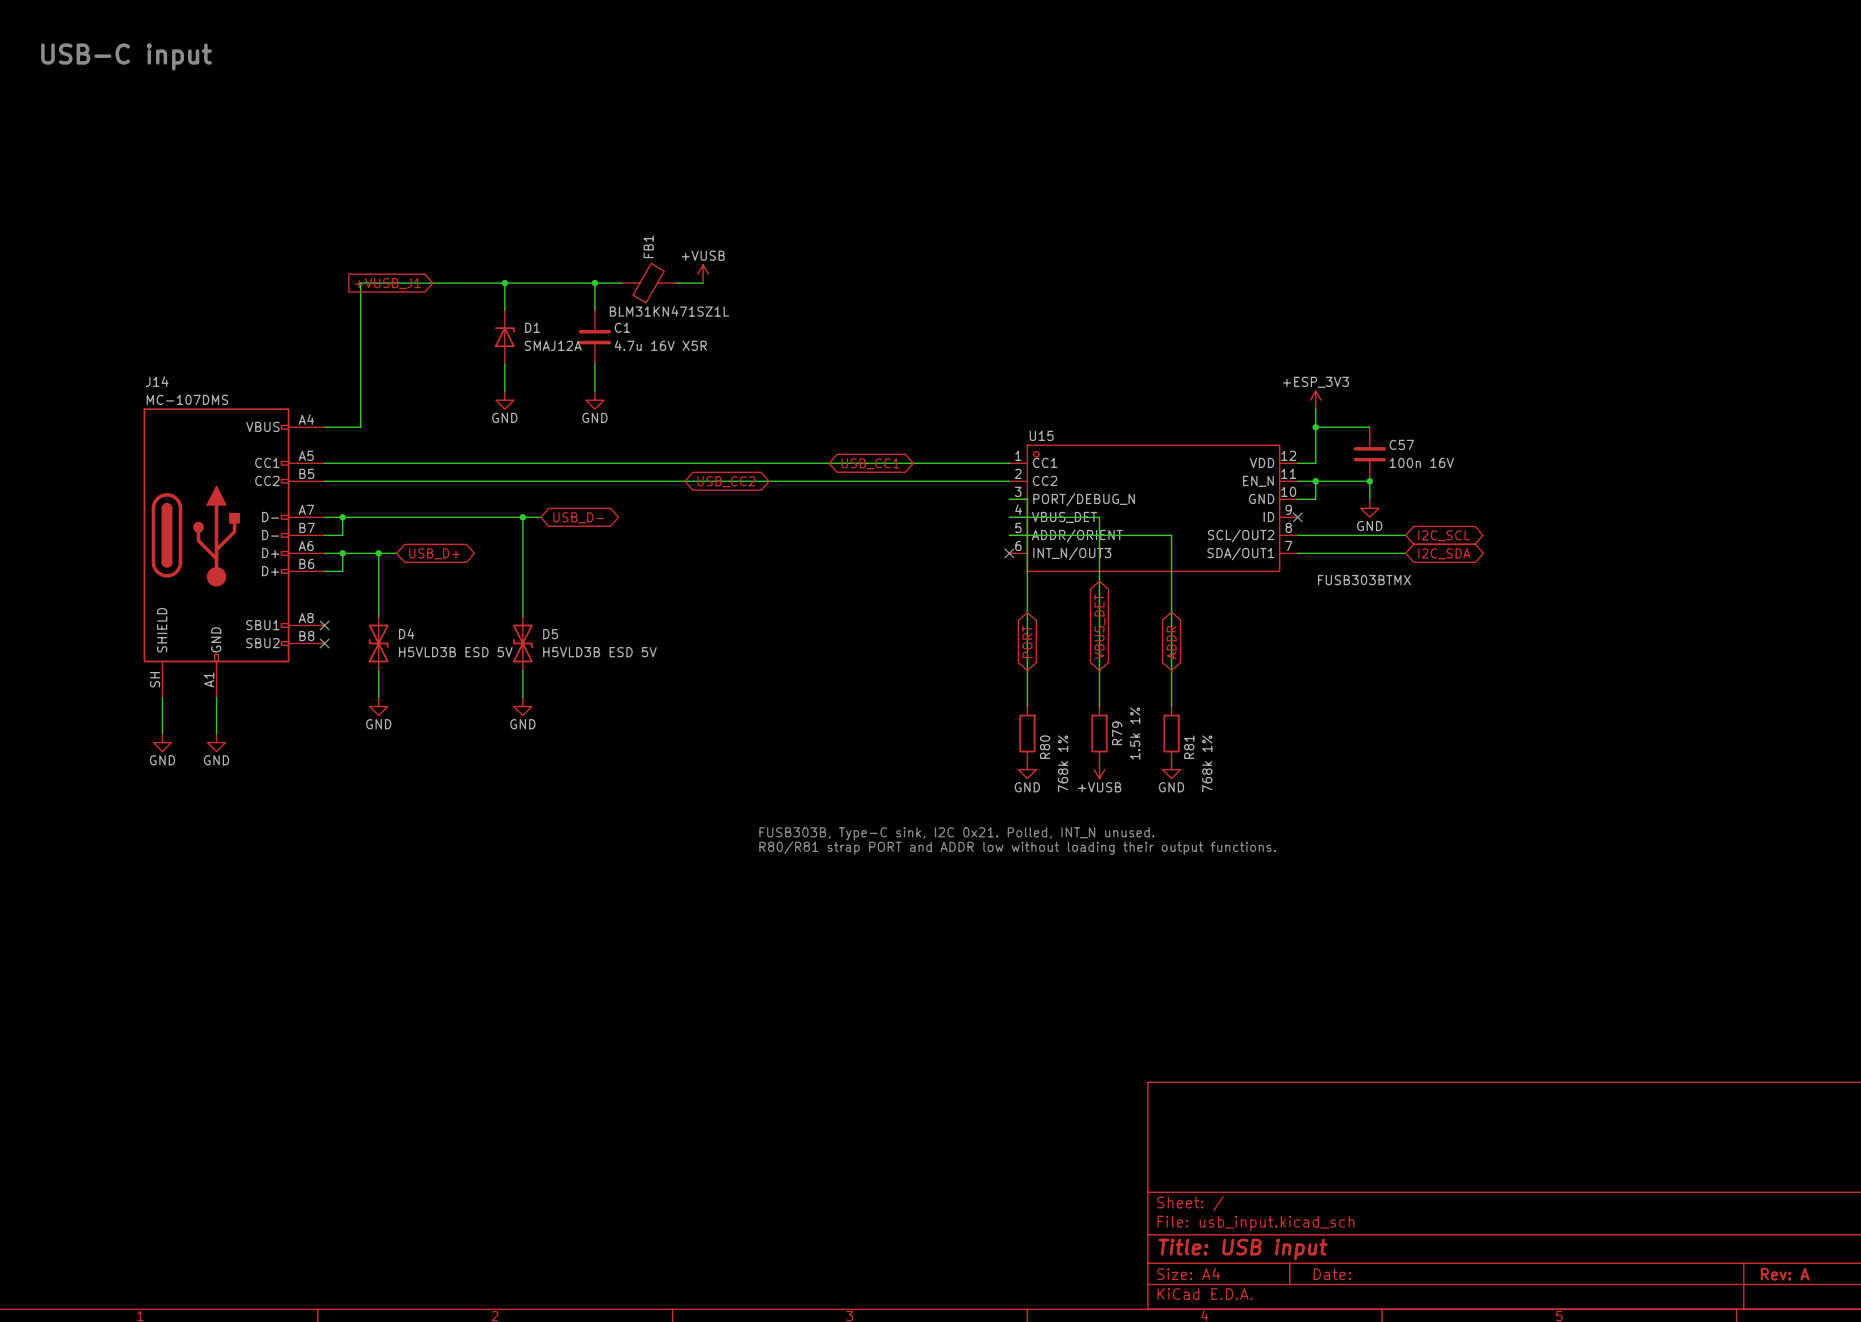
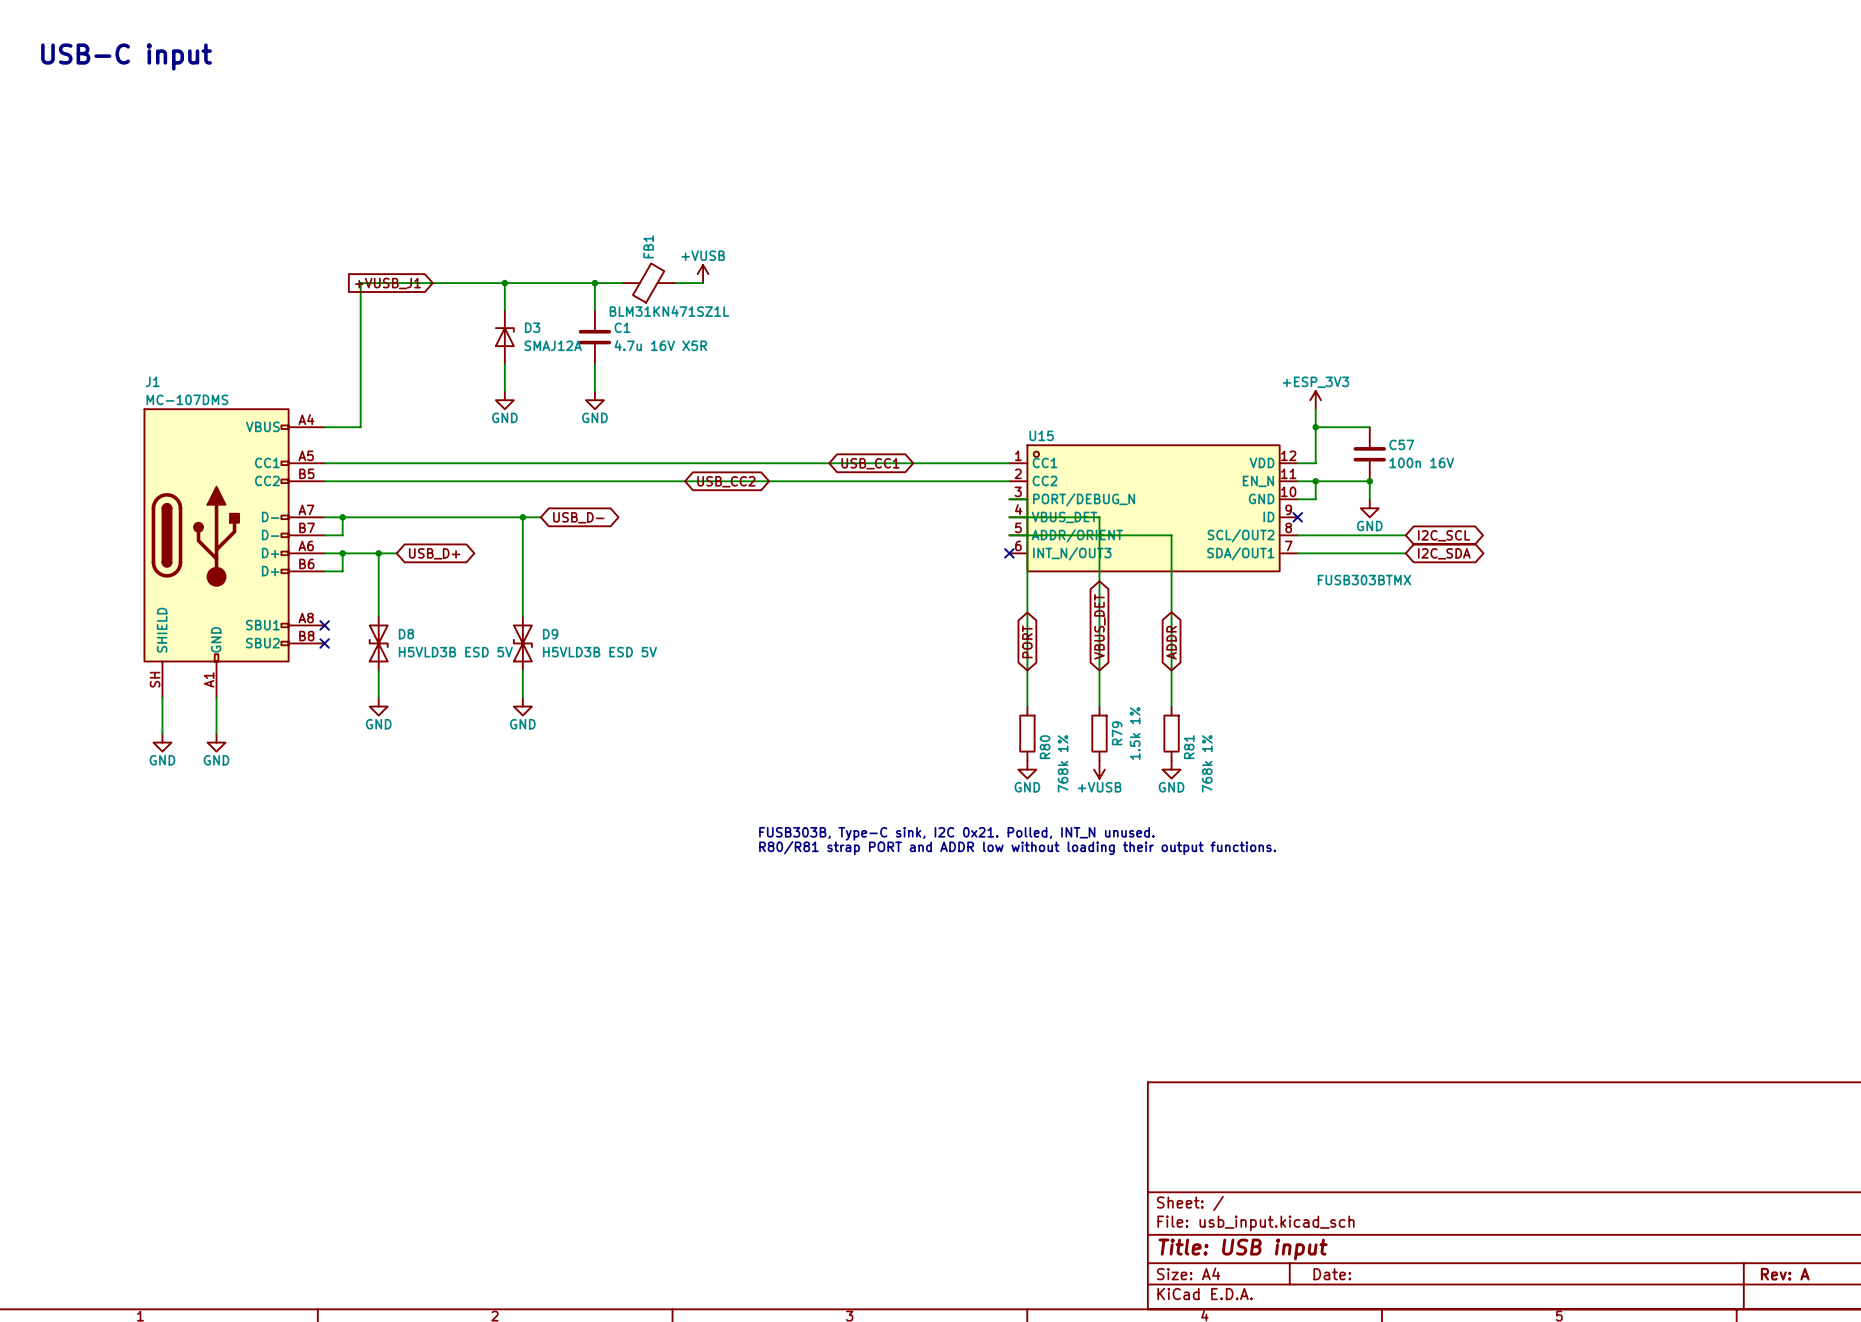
D1 name: D1 (532, 327) -> D3 (532, 327)
J14 name: J14 (157, 381) -> J1 (152, 381)
D4 name: D4 (406, 633) -> D8 (406, 634)
D5 name: D5 (550, 634) -> D9 (550, 634)

